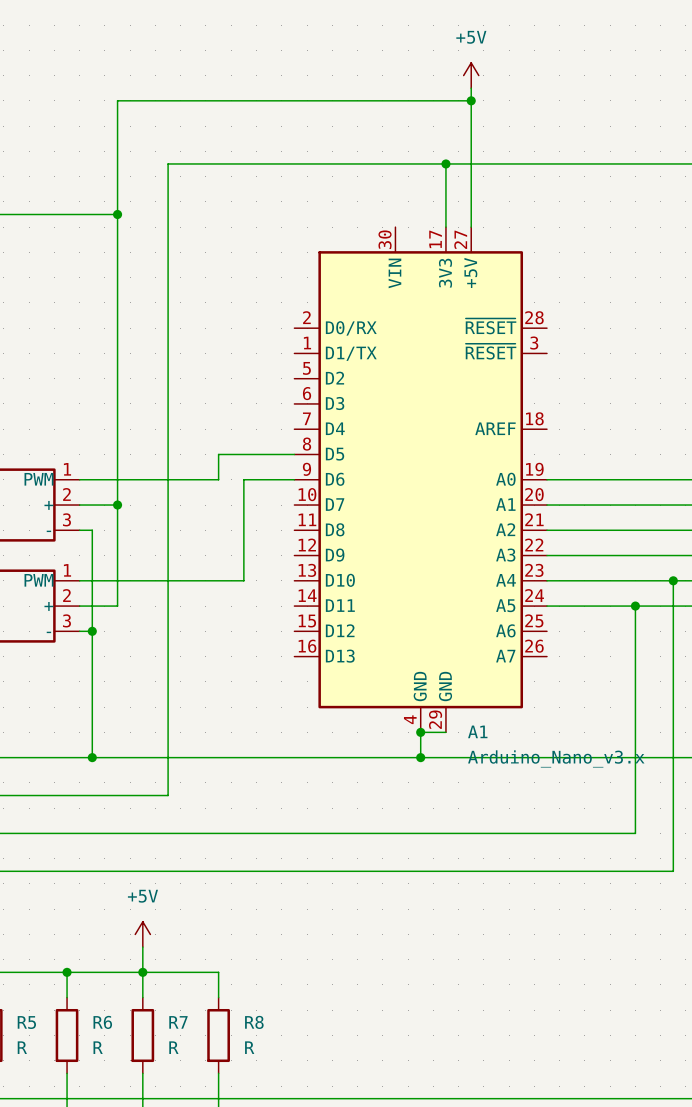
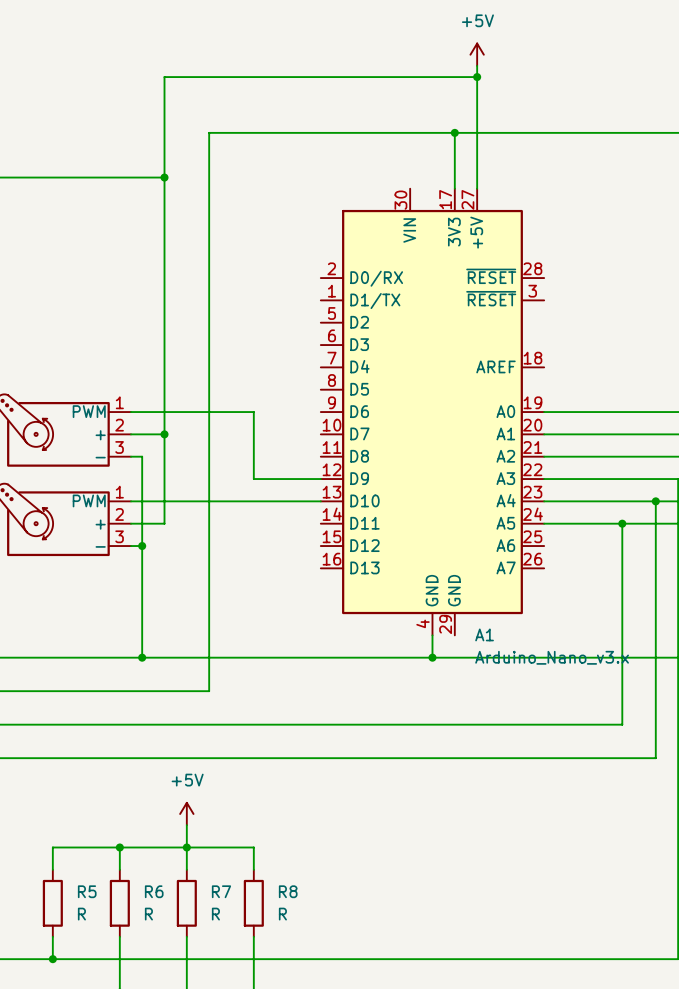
wire: (294, 454) (218, 454) (218, 479) -> (320, 479) (253, 479) (253, 412)
wire: (294, 479) (243, 479) (243, 580) -> (320, 501) (276, 501)
wire: (420, 732) (445, 732) -> none
junction: (420, 732) -> none

